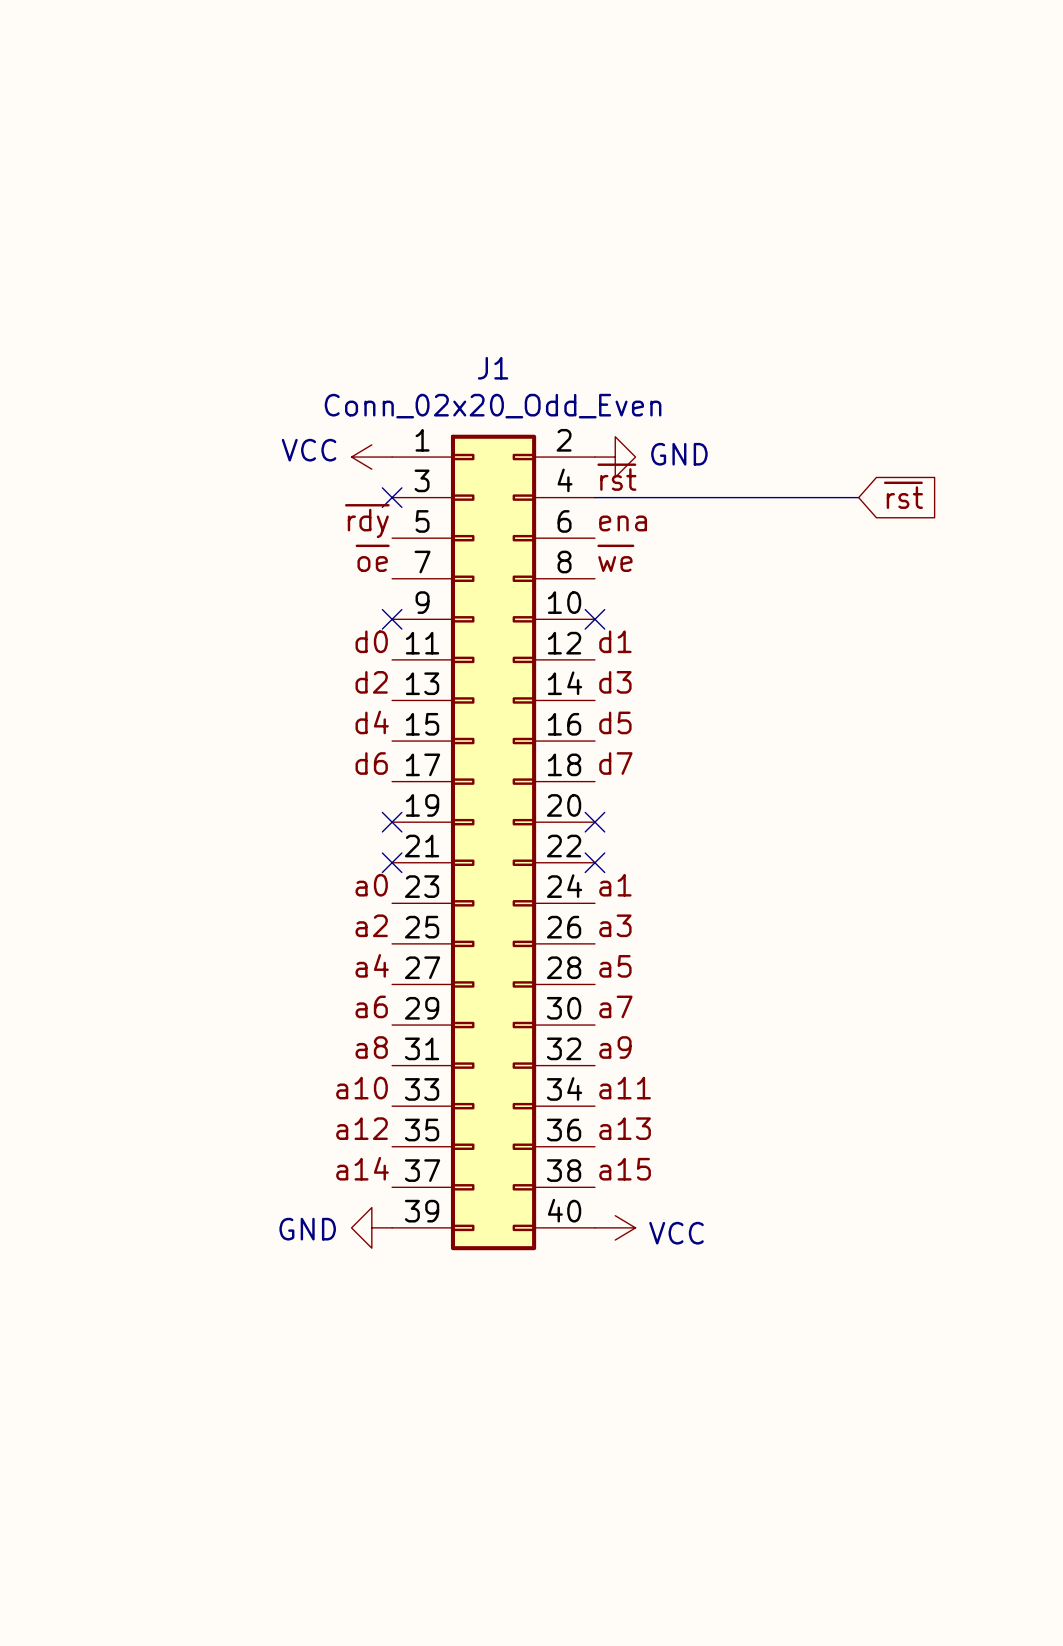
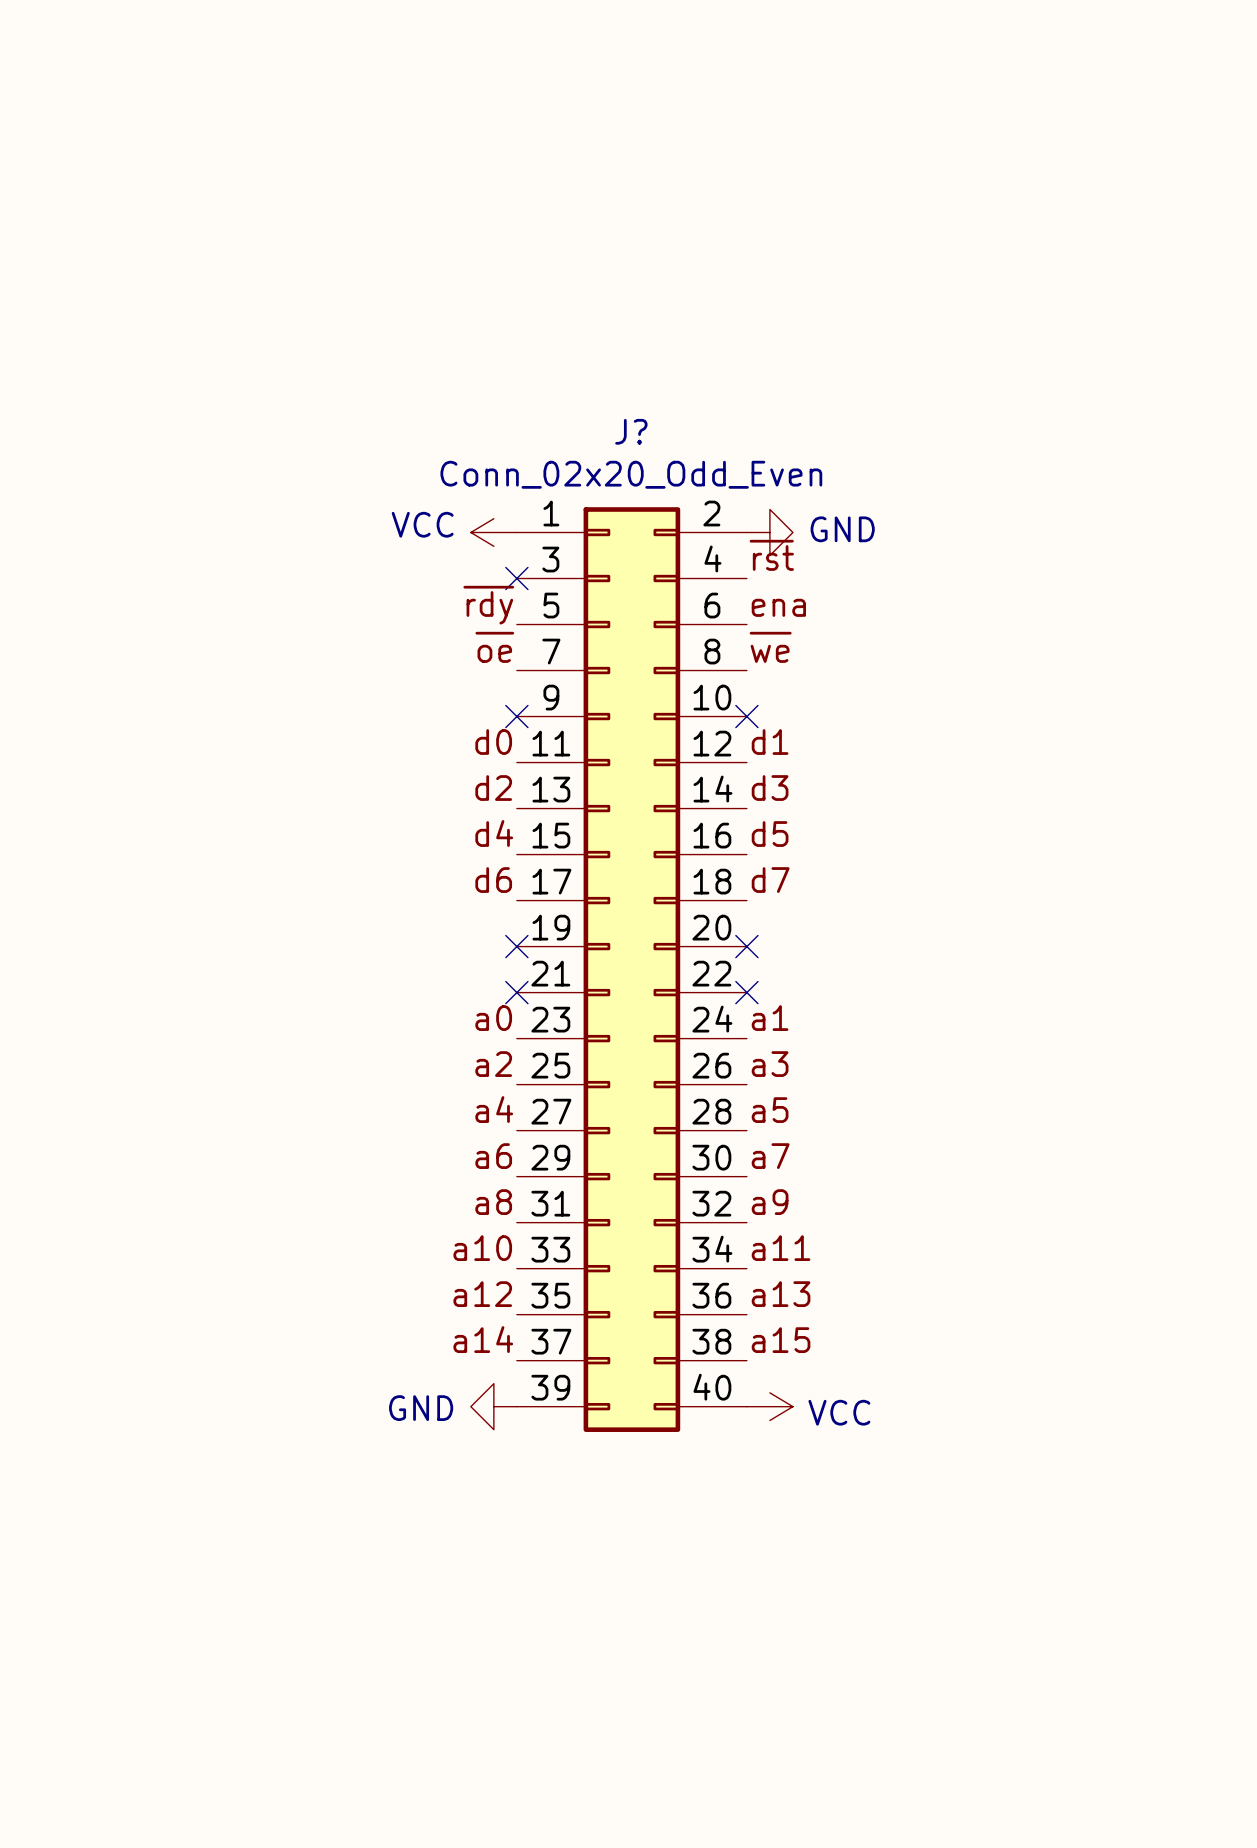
J1 name: J1 (493, 368) -> J? (631, 431)
global label: ~{rst} (903, 495) -> none
wire: (594, 497) (858, 497) -> none

